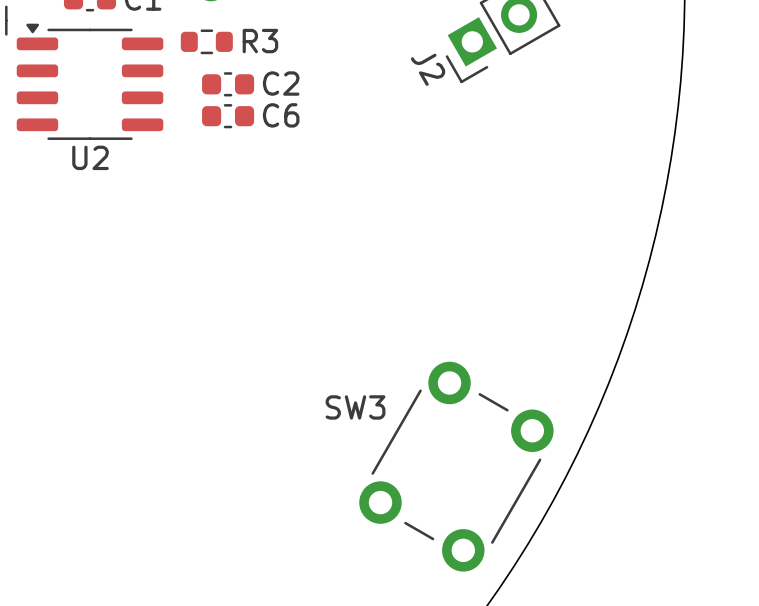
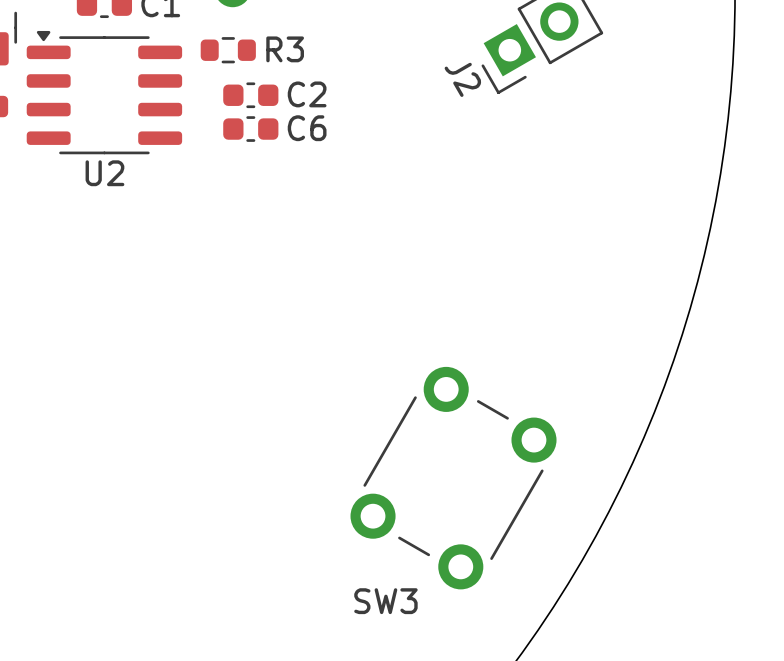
SW3 name position: SW3 (355, 407) -> SW3 (385, 601)
SW3 position: (456, 466) -> (453, 478)

